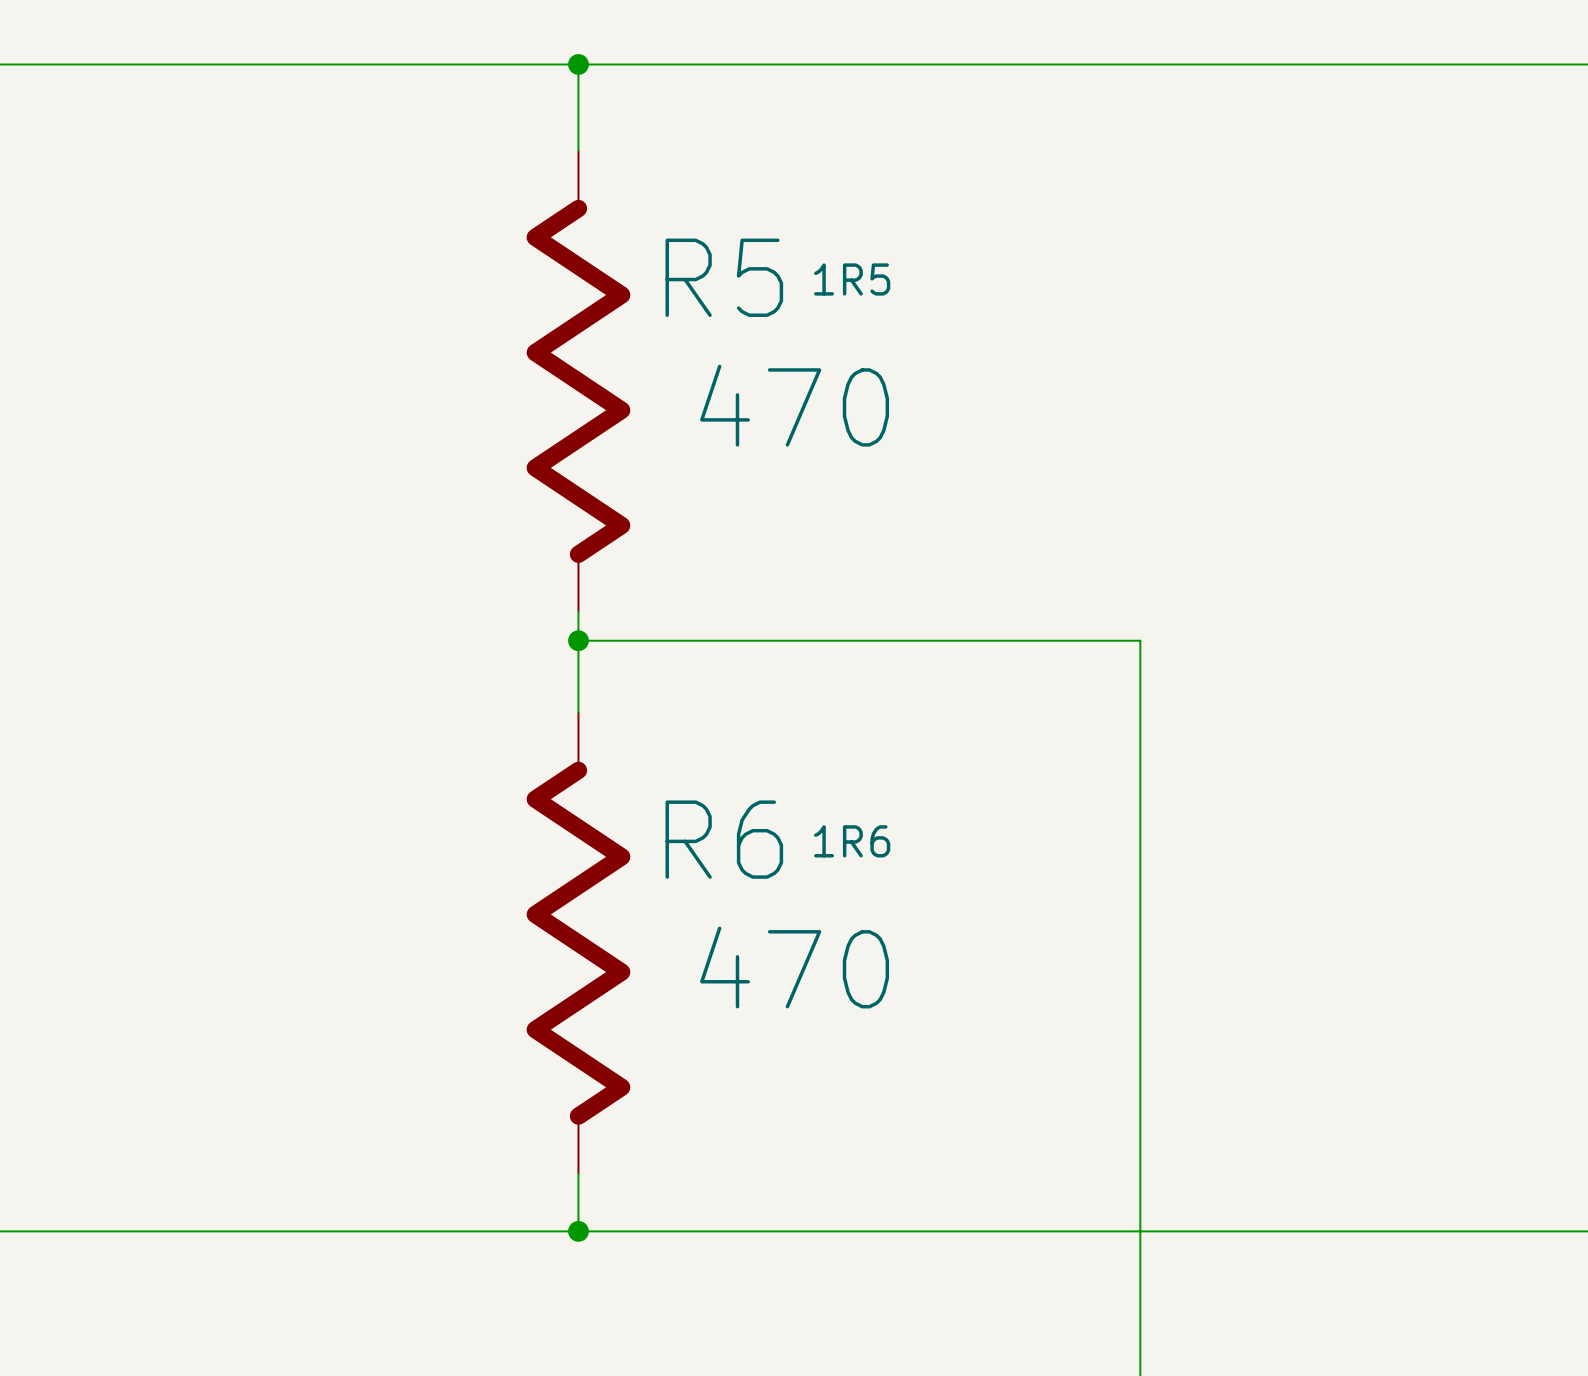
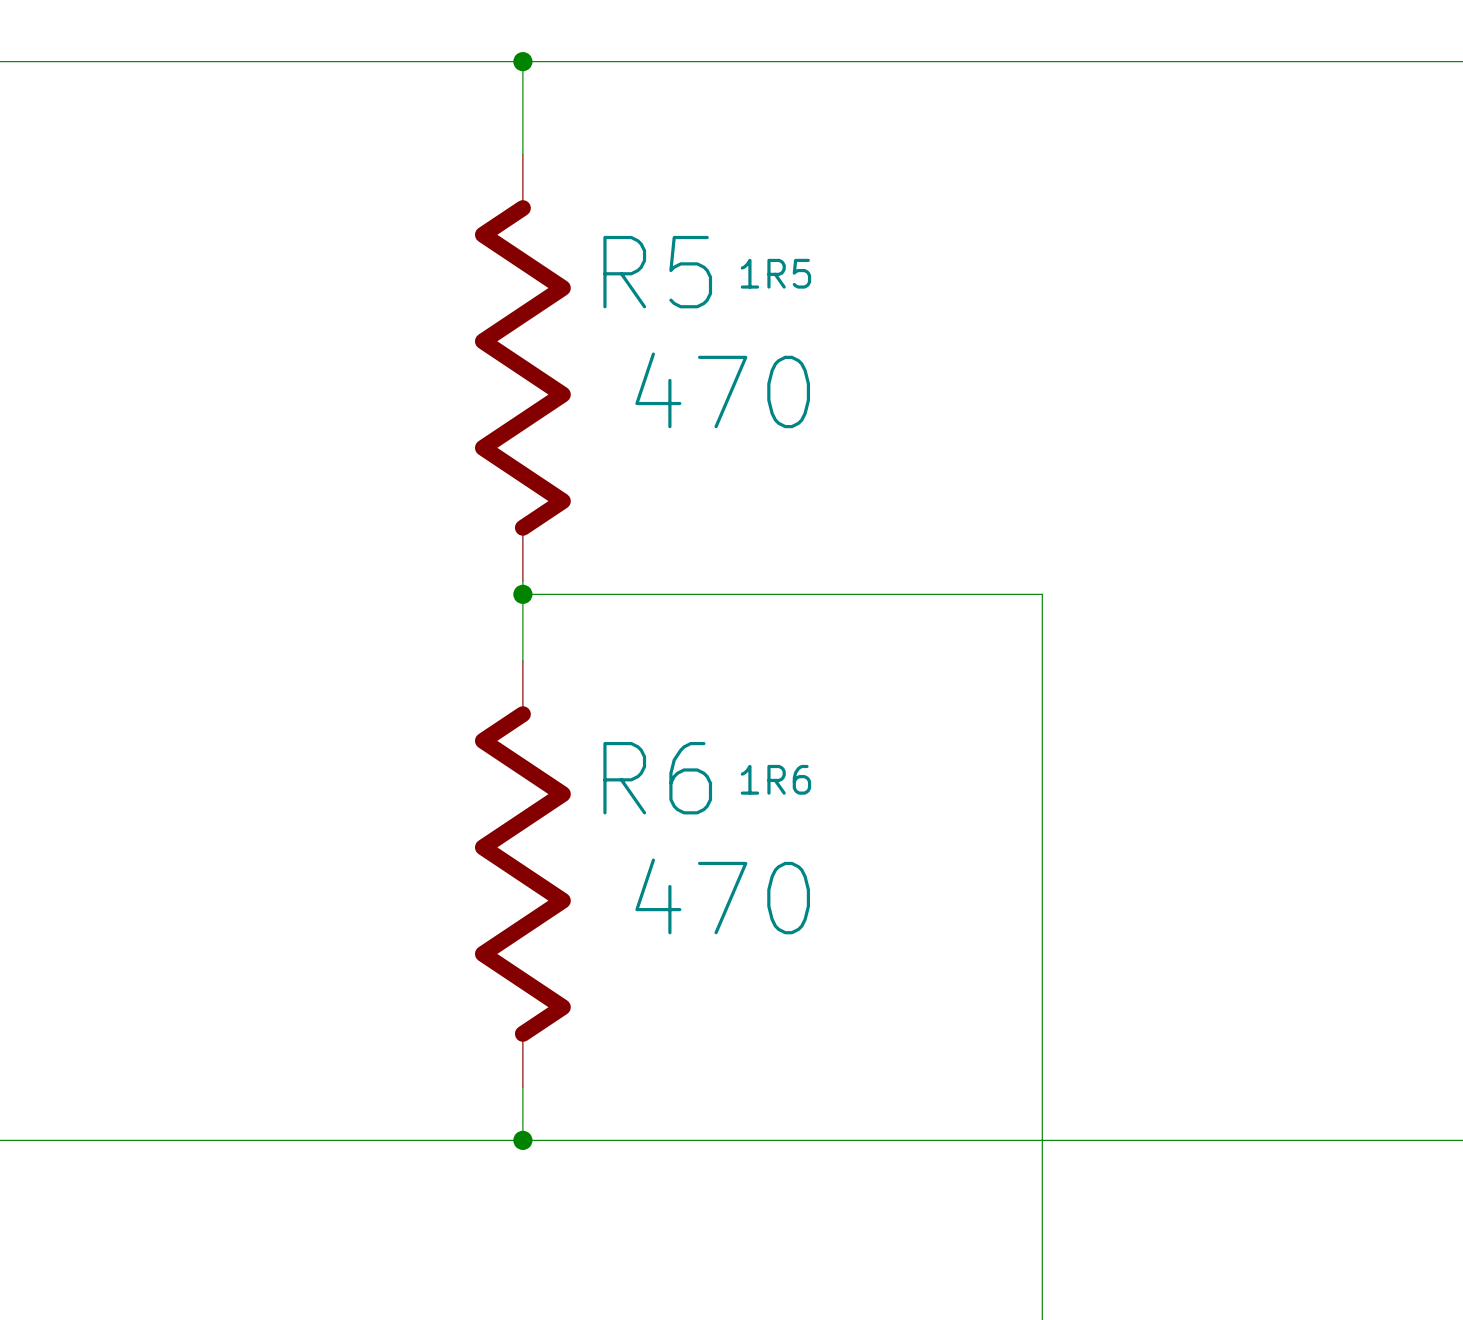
1R5 position: (578, 381) -> (522, 367)

